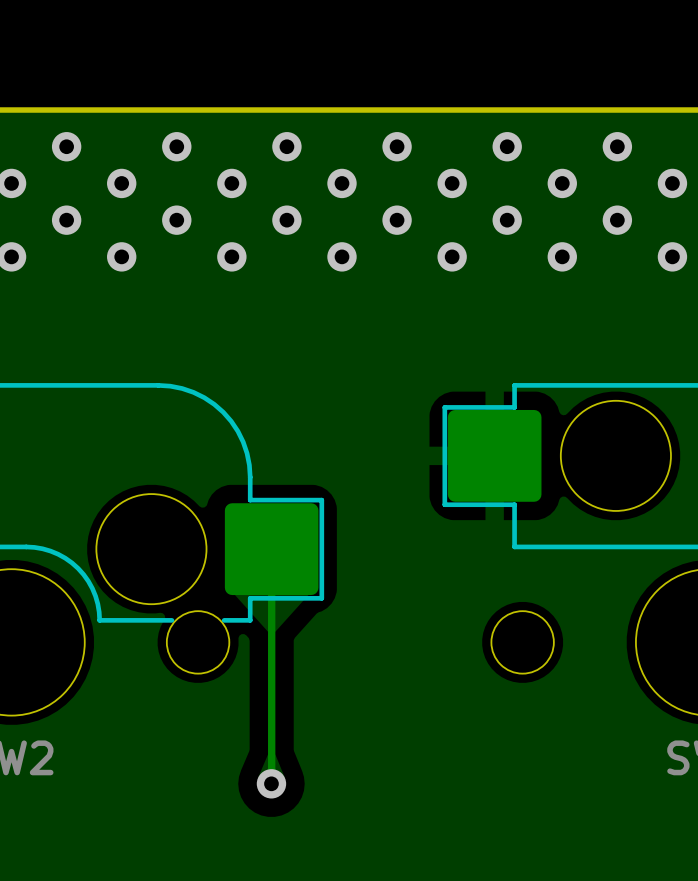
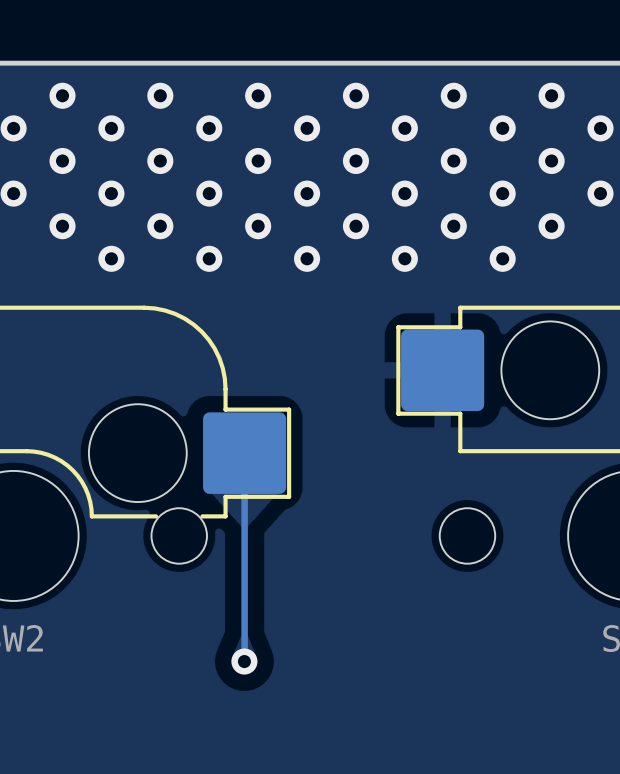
via: none -> (62, 226)
via: none -> (160, 226)
via: none -> (258, 226)
via: none -> (355, 226)
via: none -> (453, 226)
via: none -> (551, 226)
via: none -> (111, 258)
via: none -> (209, 258)
via: none -> (307, 258)
via: none -> (404, 258)
via: none -> (502, 258)

